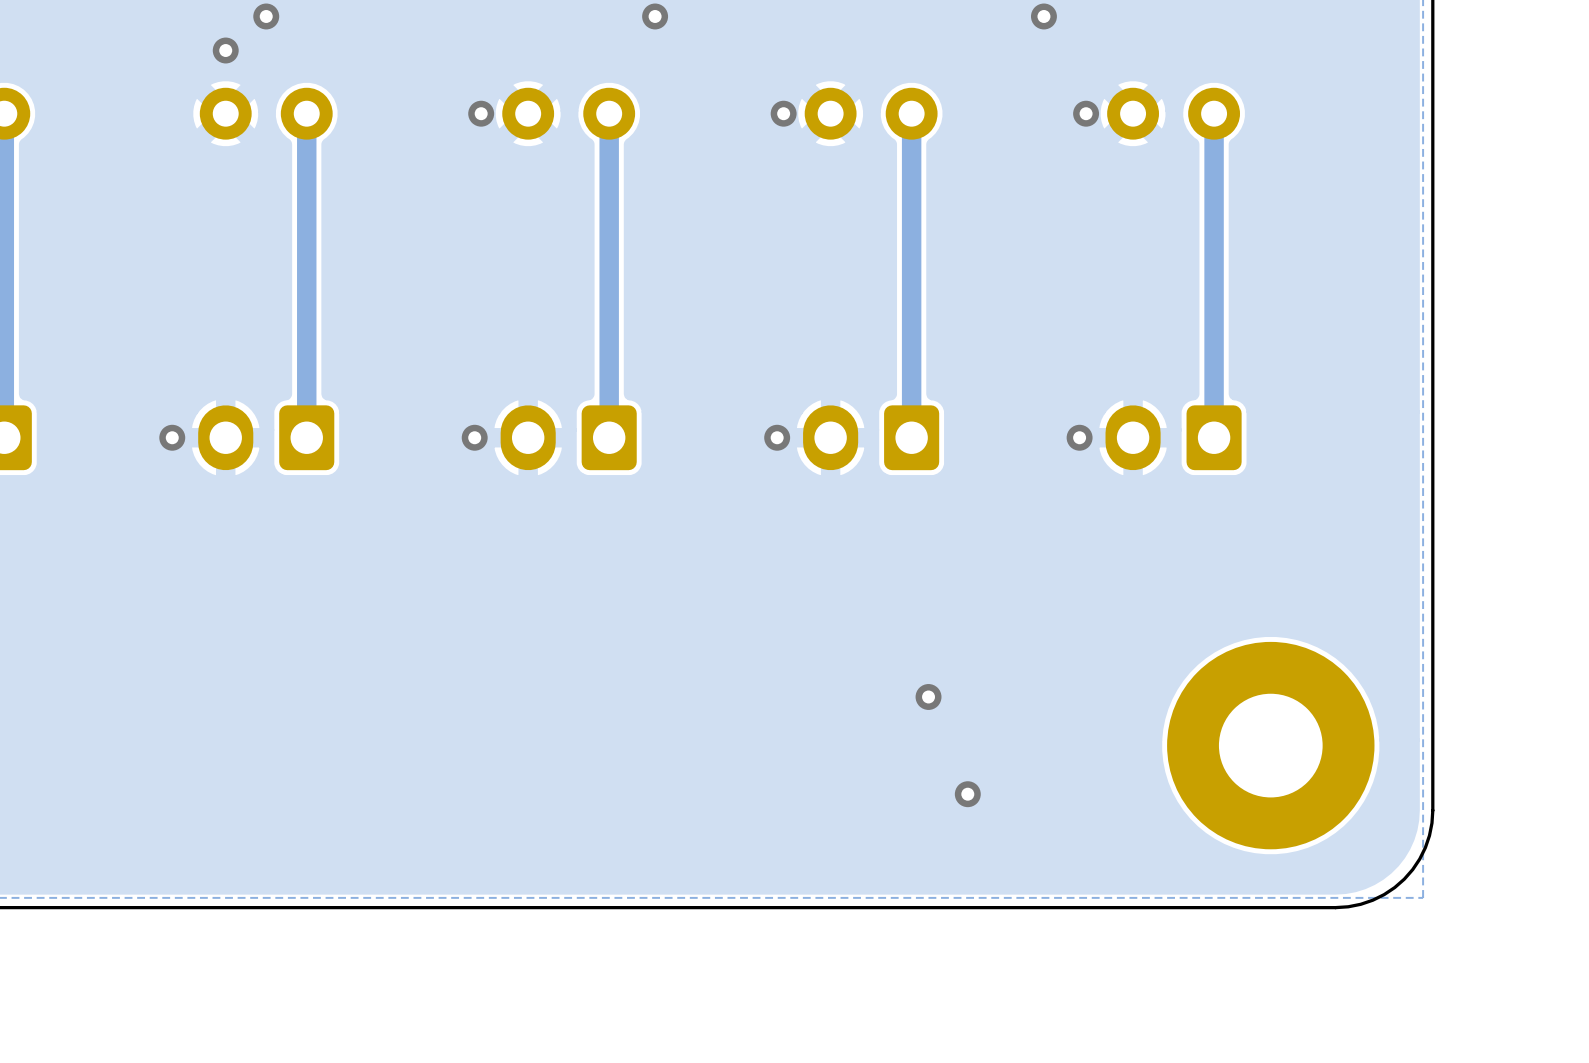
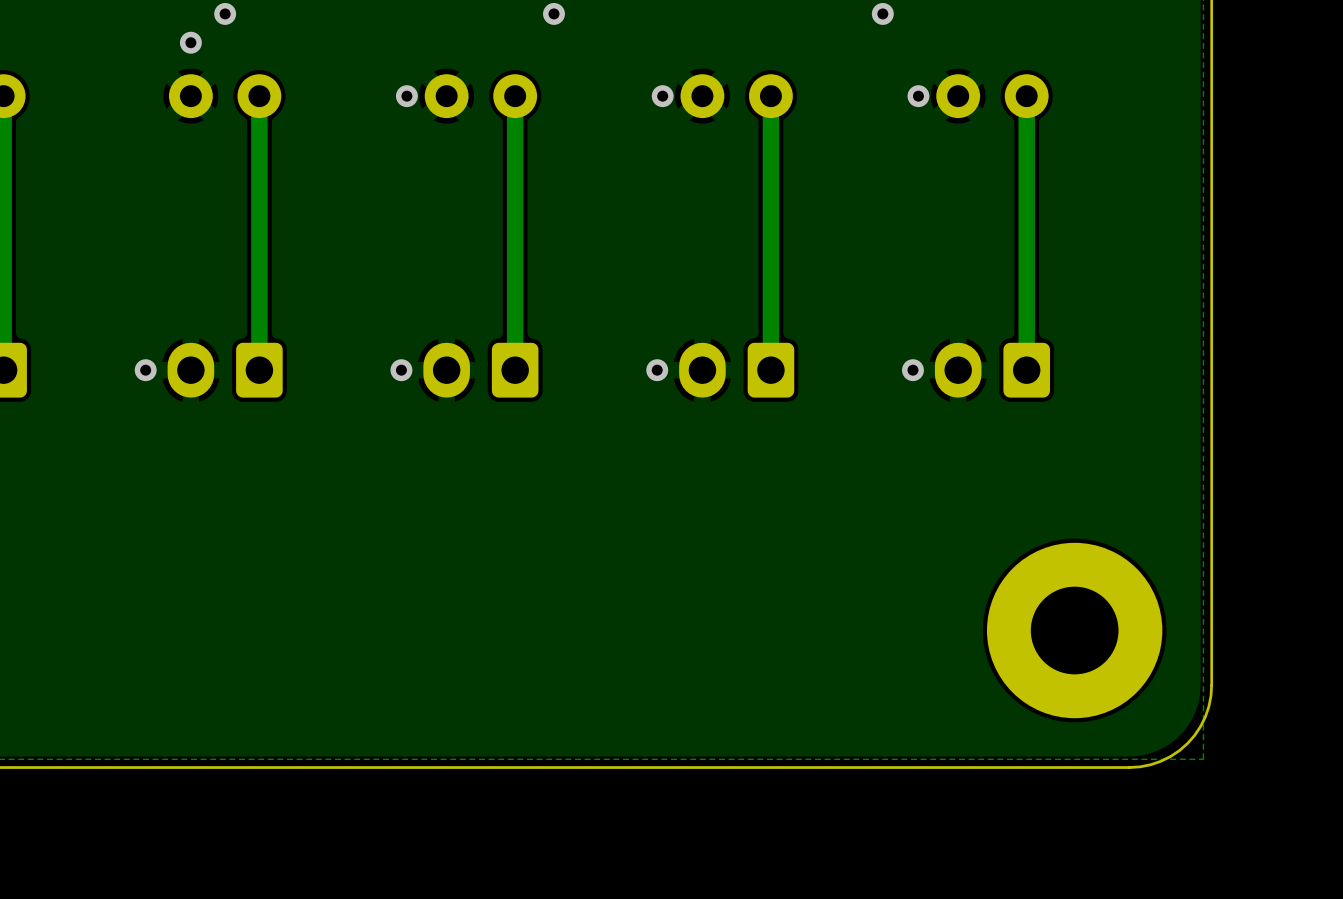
via: (928, 696) -> none
via: (967, 794) -> none

